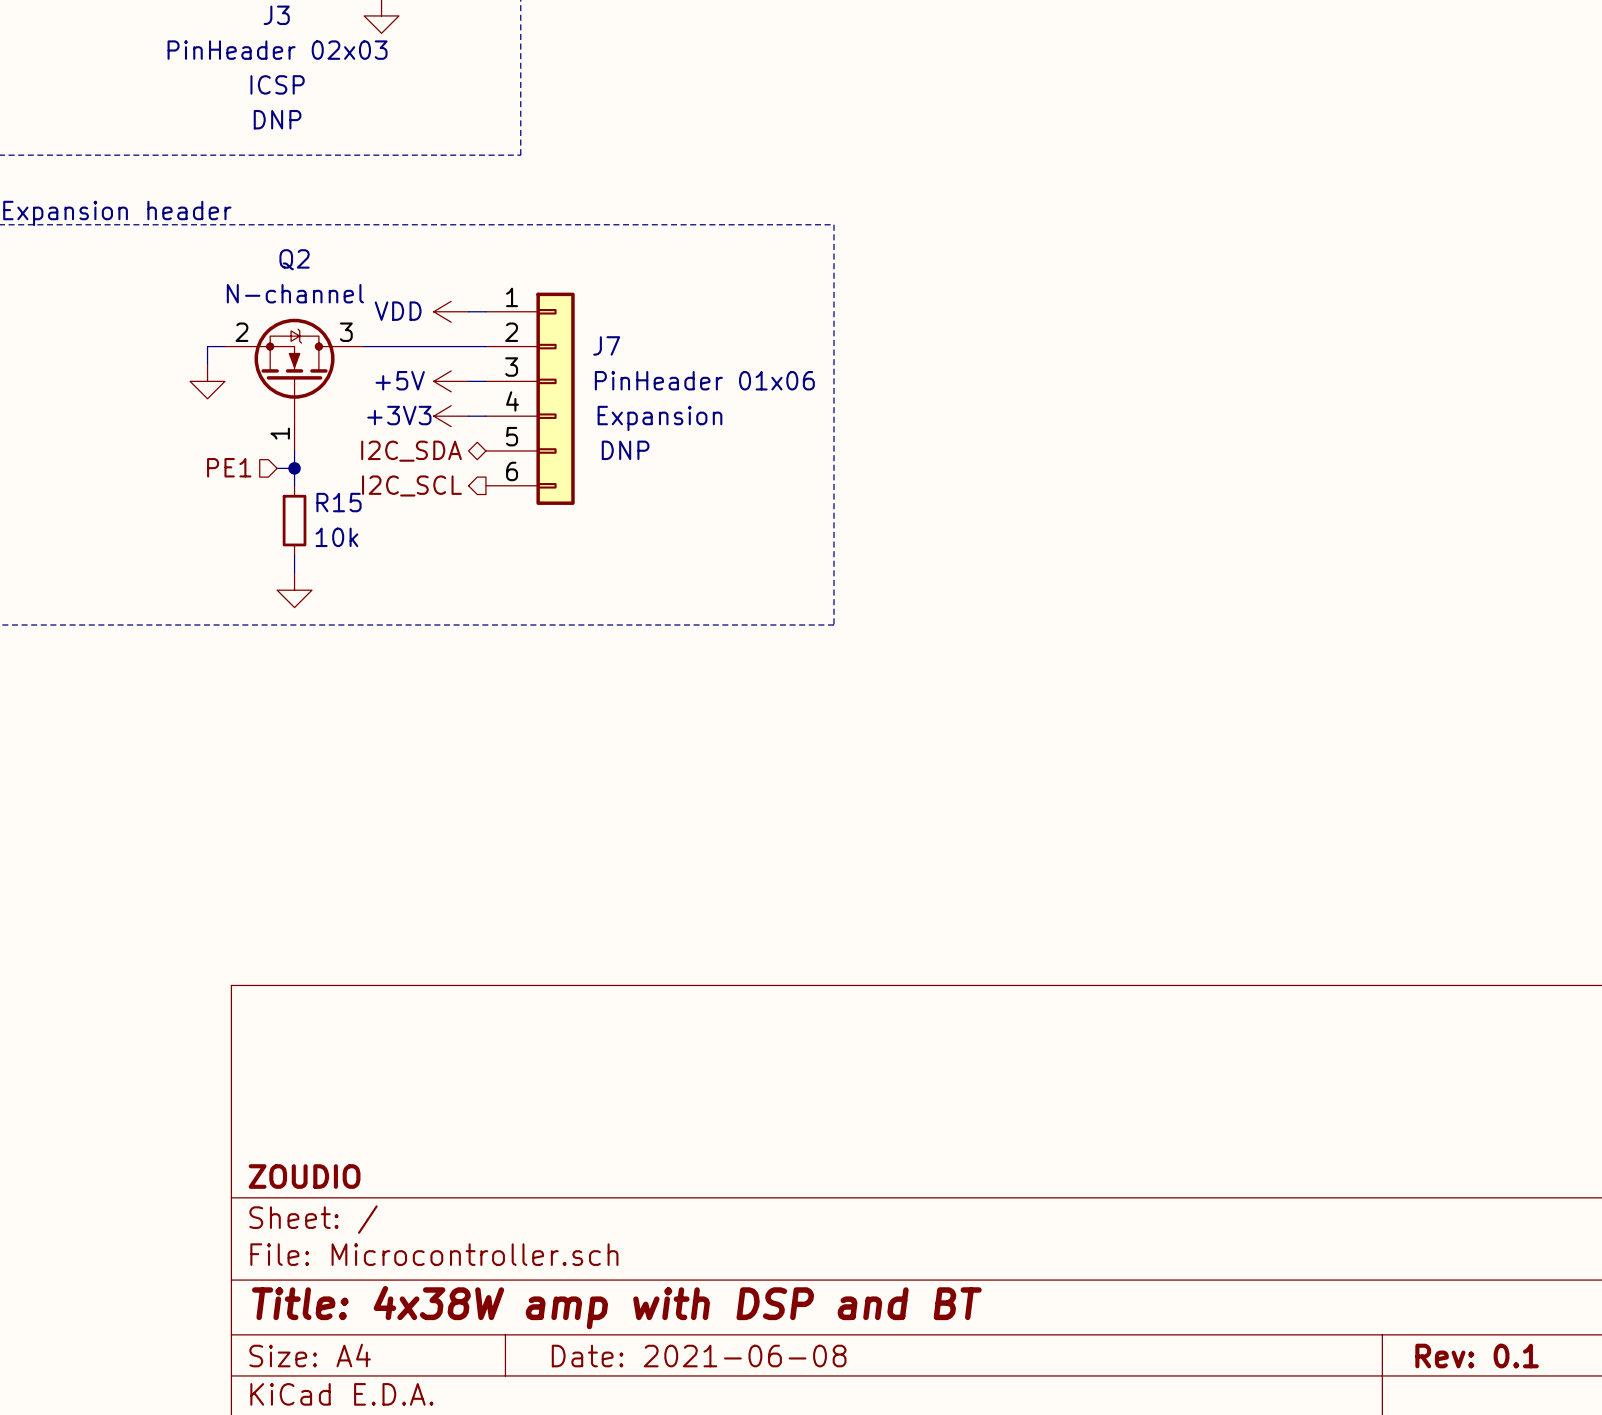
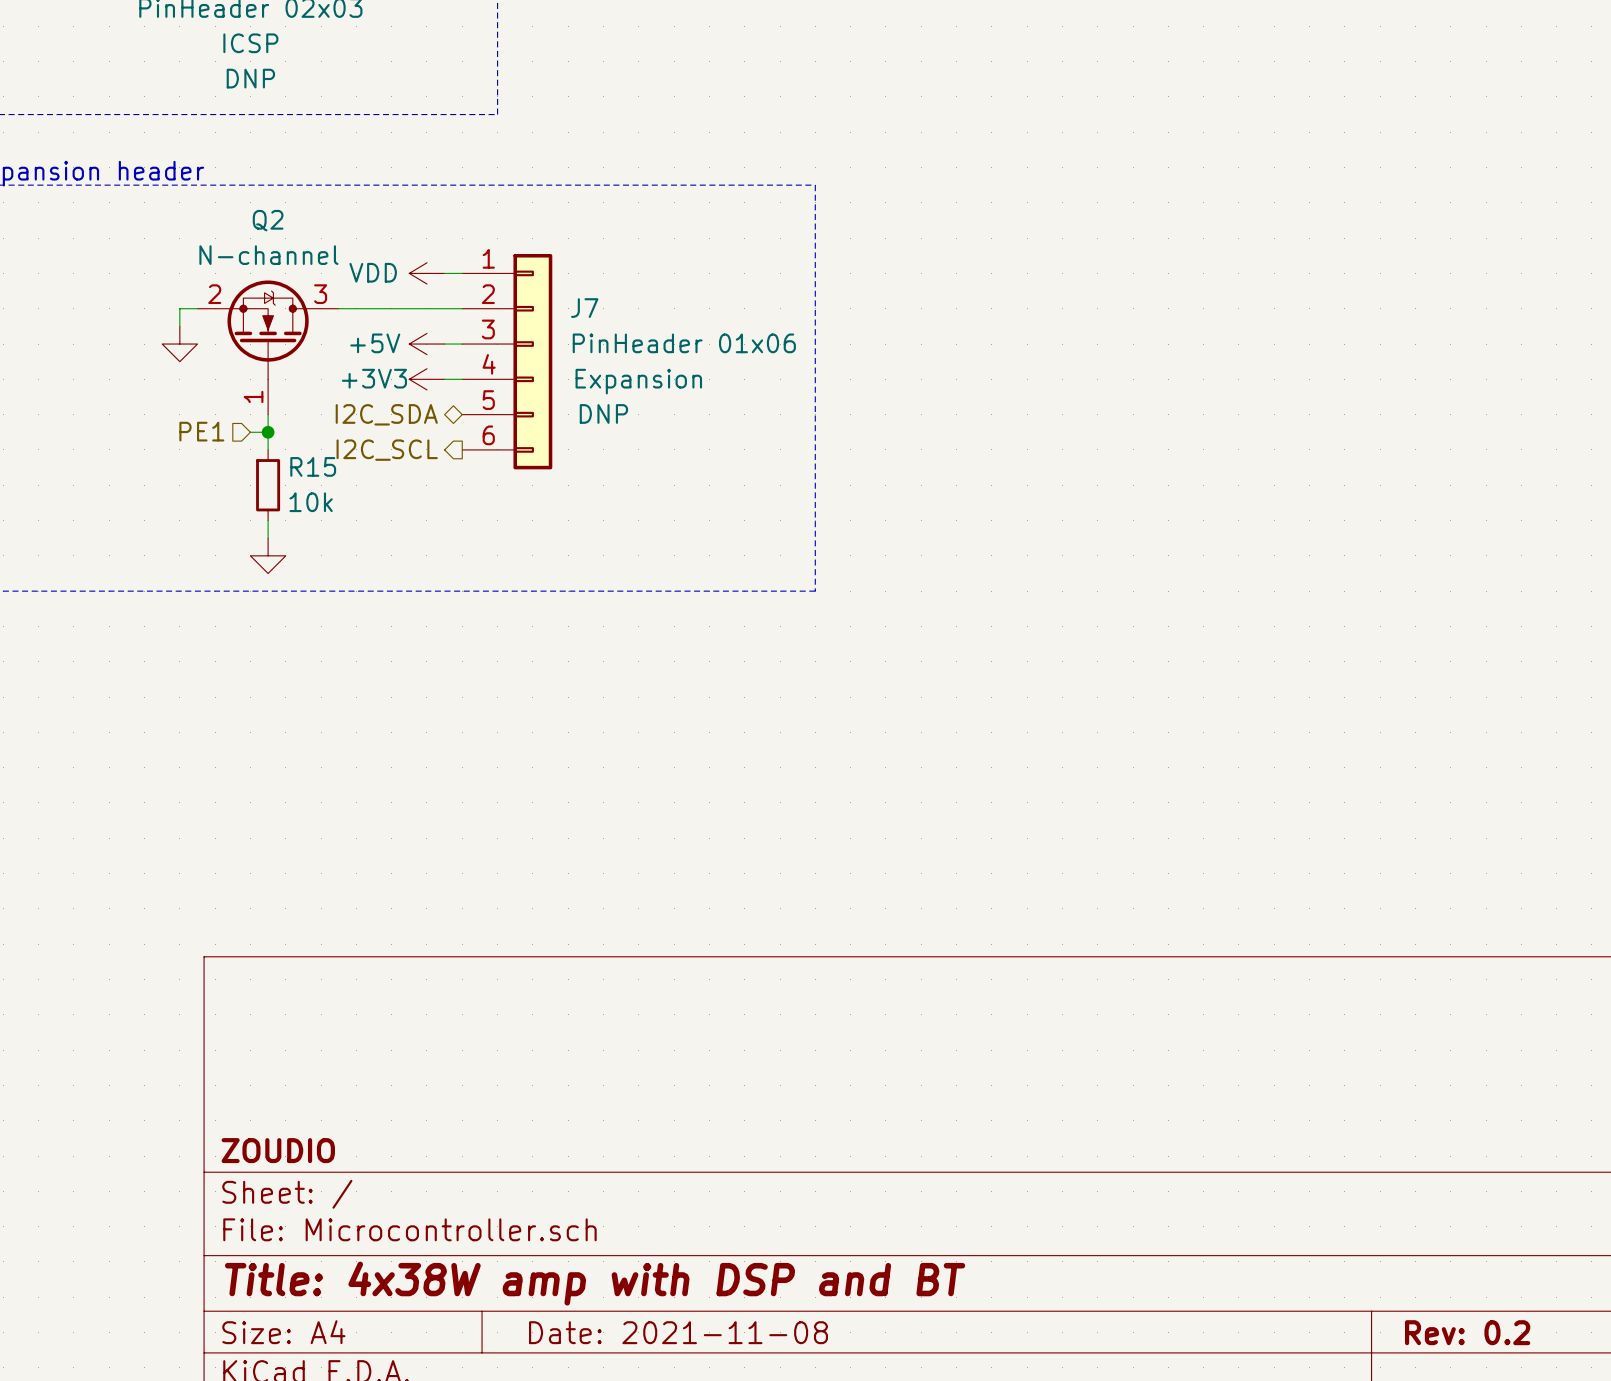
title block: Date: 2021-06-08 (699, 1356) -> Date: 2021-11-08 (678, 1332)
title block: Rev: 0.1 (1477, 1356) -> Rev: 0.2 (1467, 1332)

